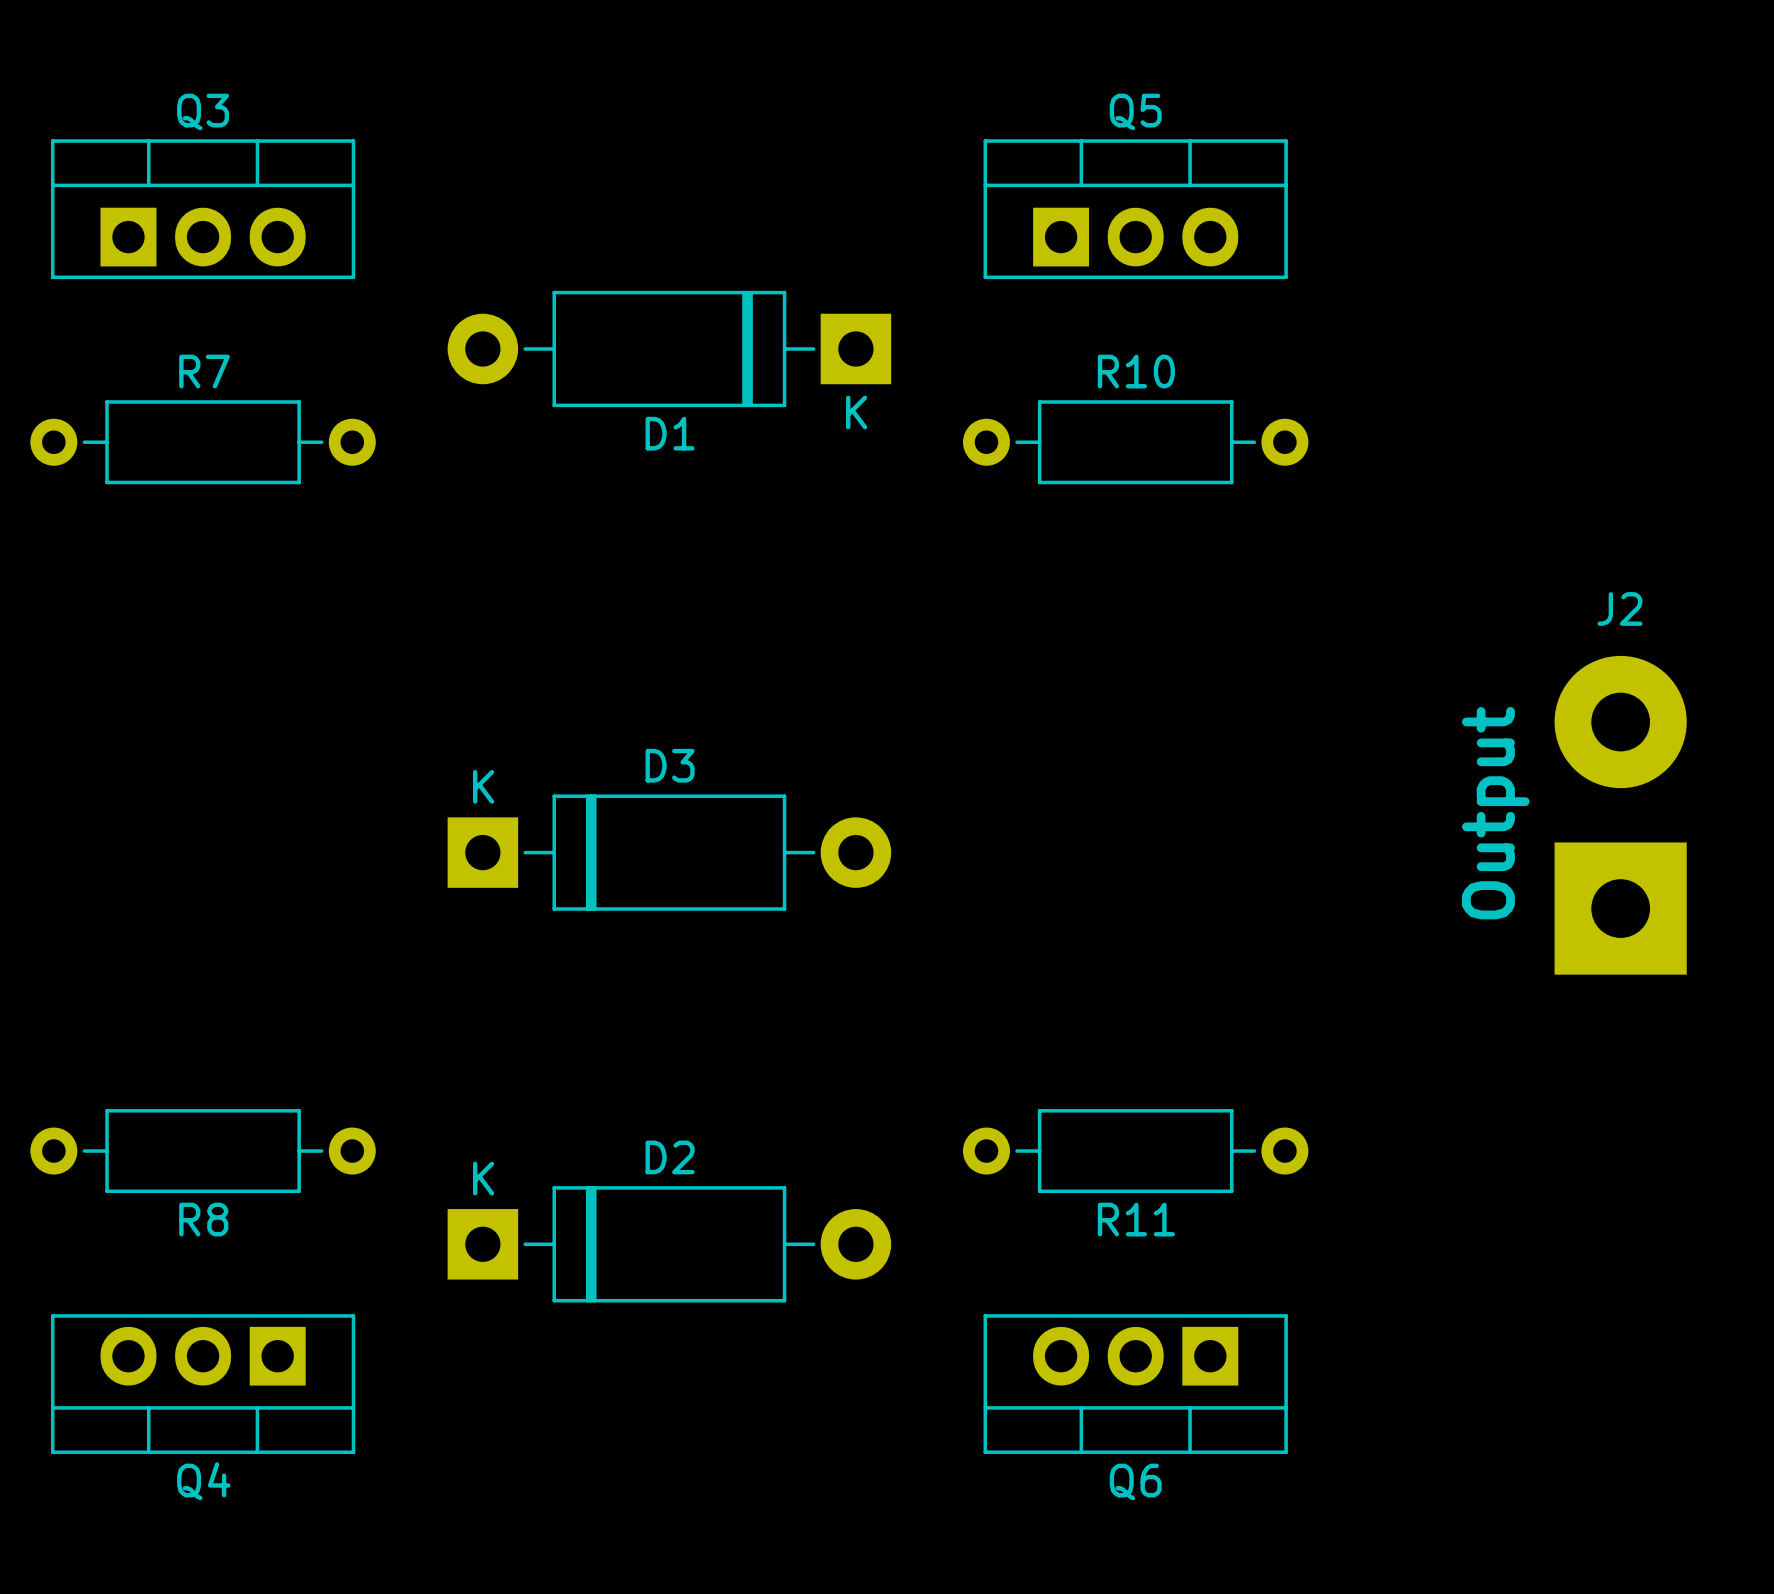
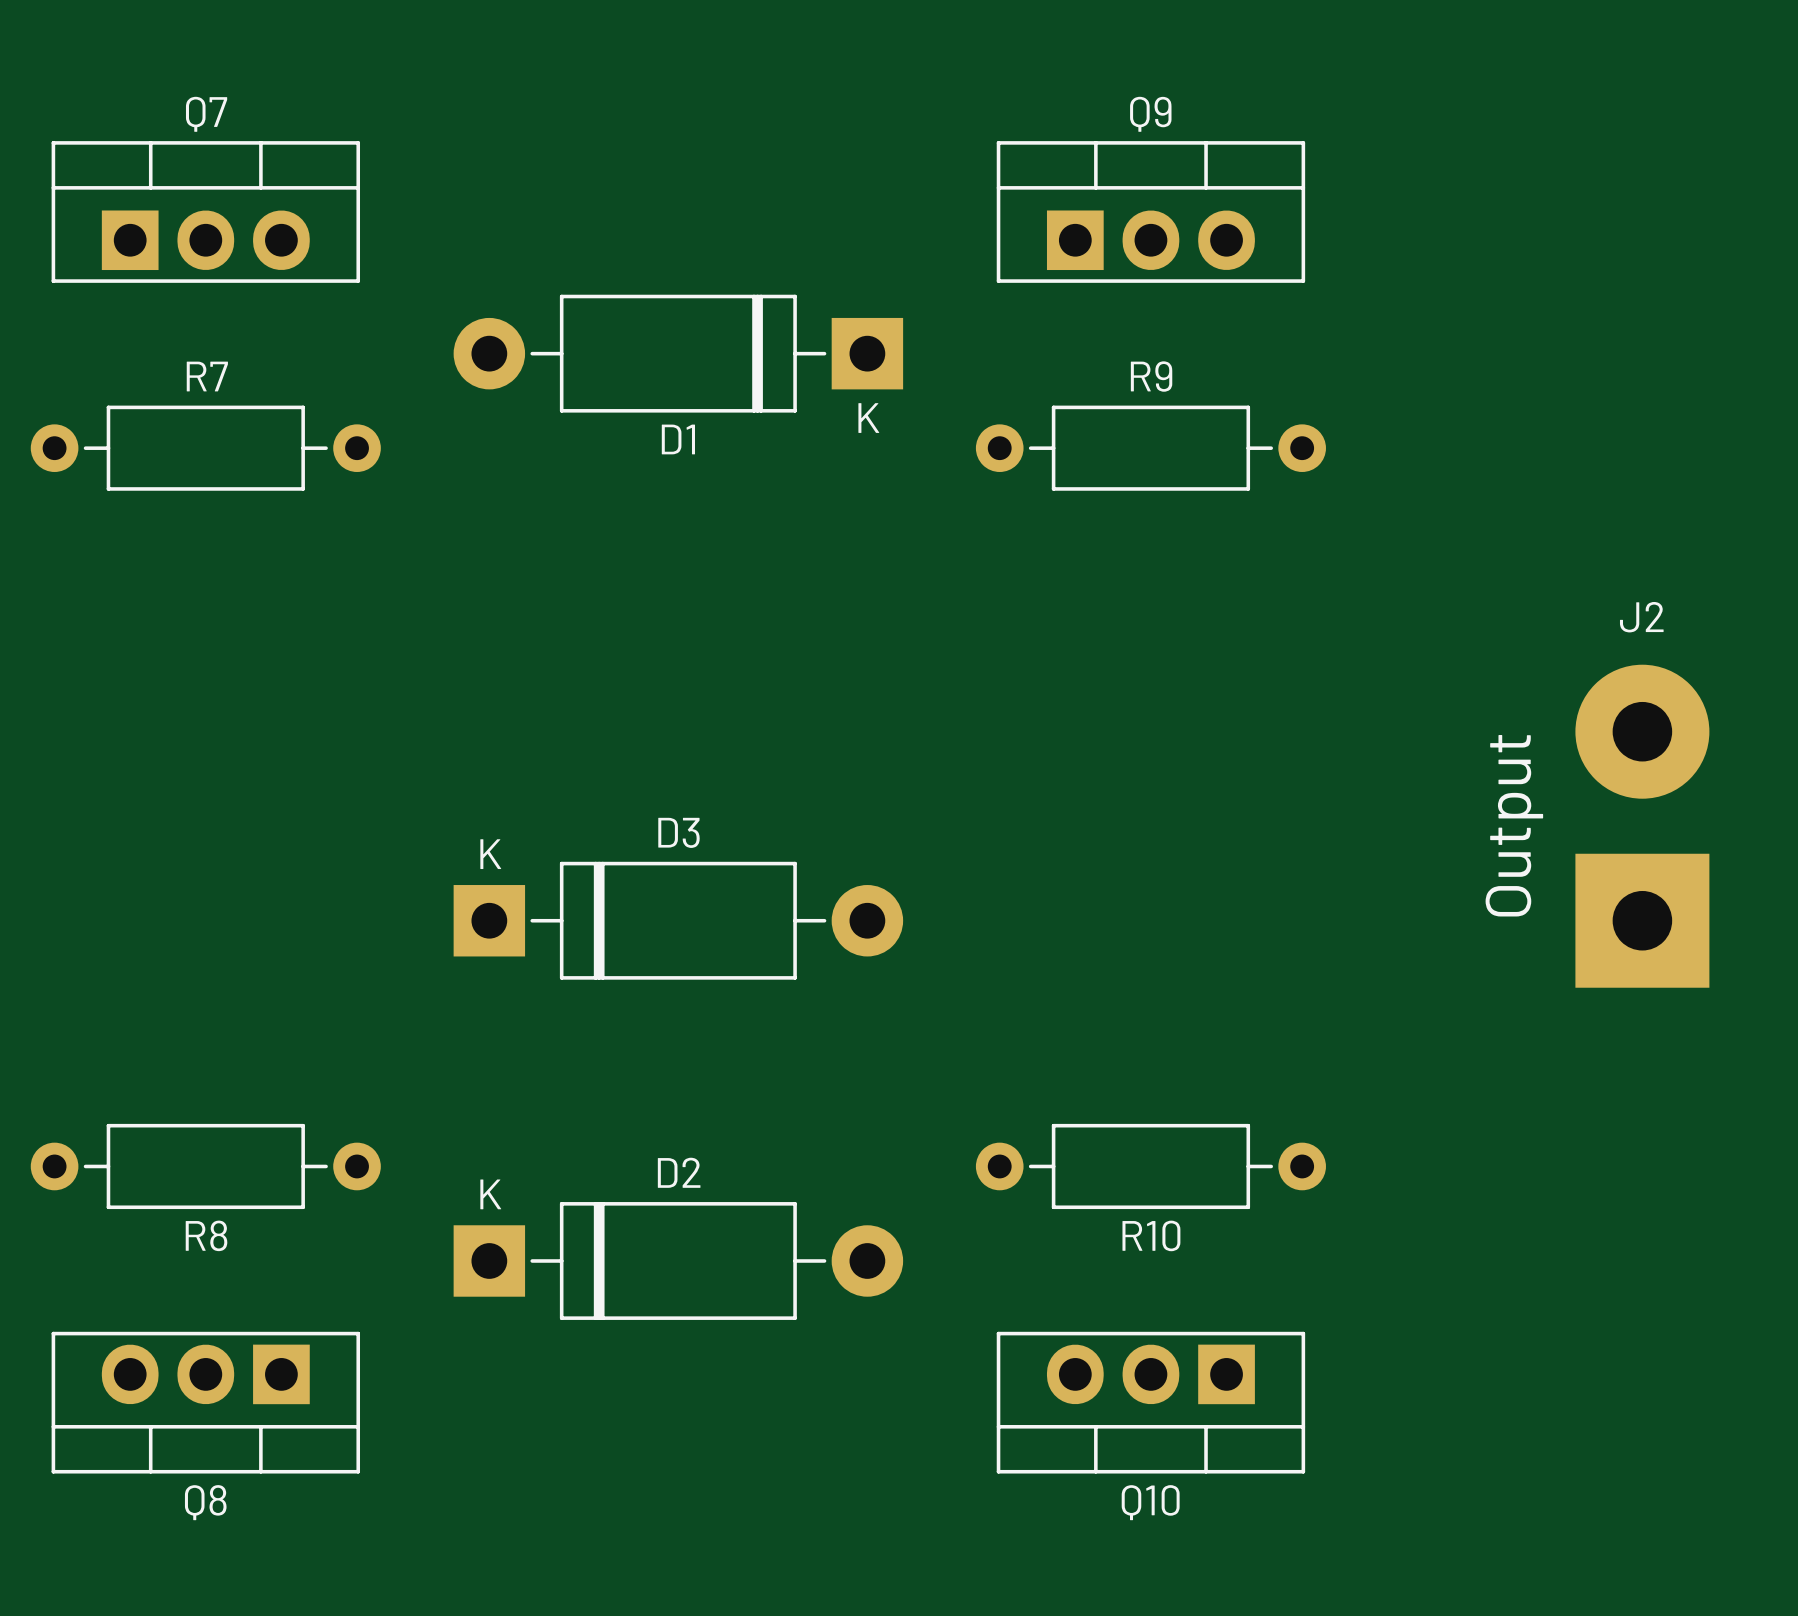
Q3 name: Q3 (203, 111) -> Q7 (206, 114)
Q5 name: Q5 (1135, 111) -> Q9 (1150, 114)
R10 name: R10 (1136, 371) -> R9 (1151, 376)
D3 position: (669, 852) -> (678, 920)
R11 name: R11 (1136, 1219) -> R10 (1151, 1235)
Q4 name: Q4 (203, 1481) -> Q8 (205, 1502)
Q6 name: Q6 (1135, 1481) -> Q10 (1150, 1502)

